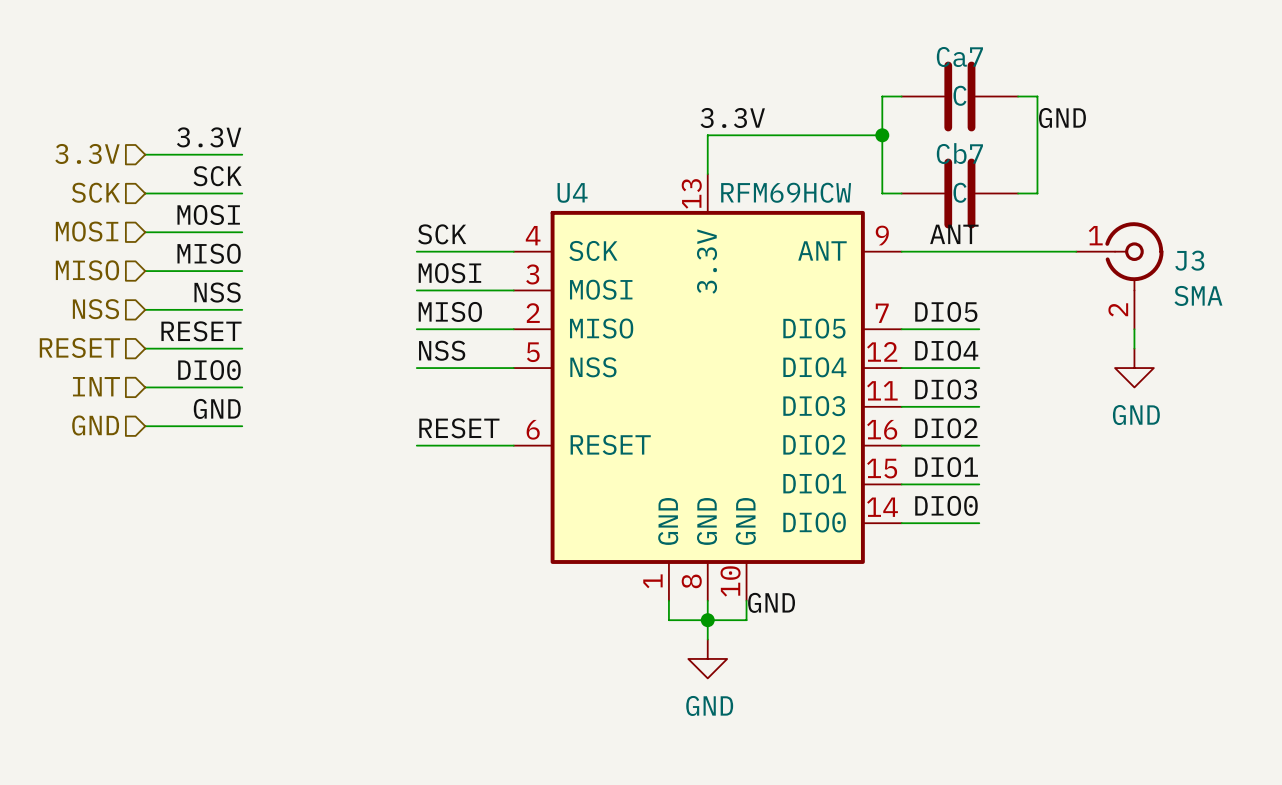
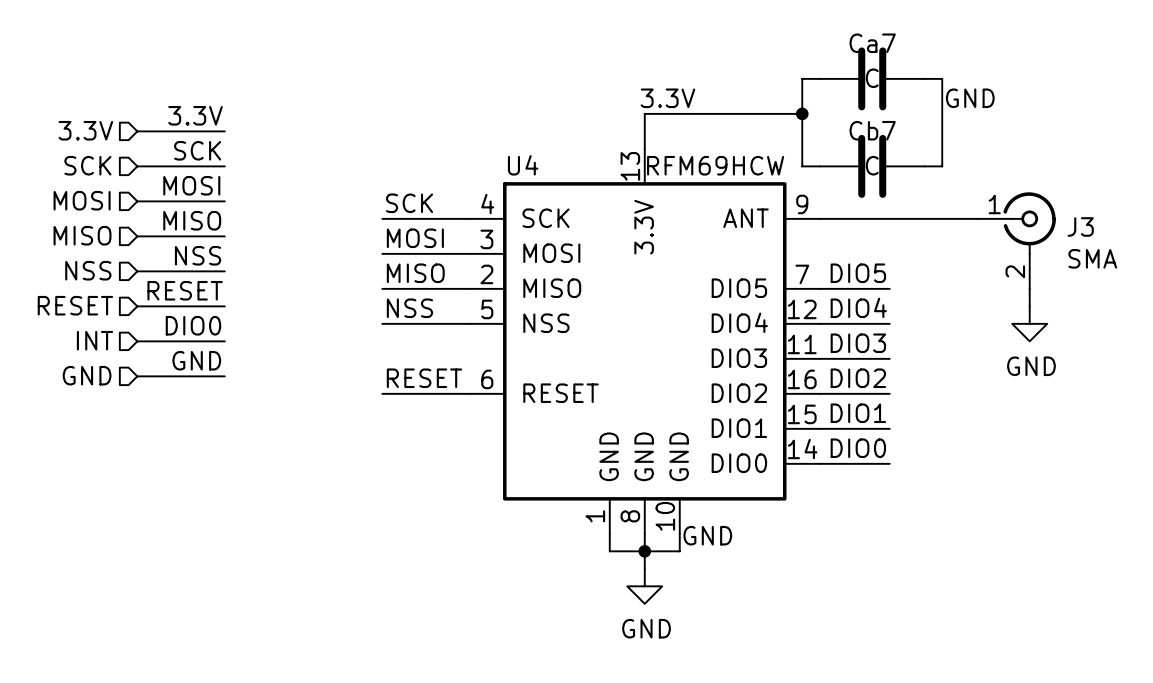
label: ANT (954, 234) -> none

